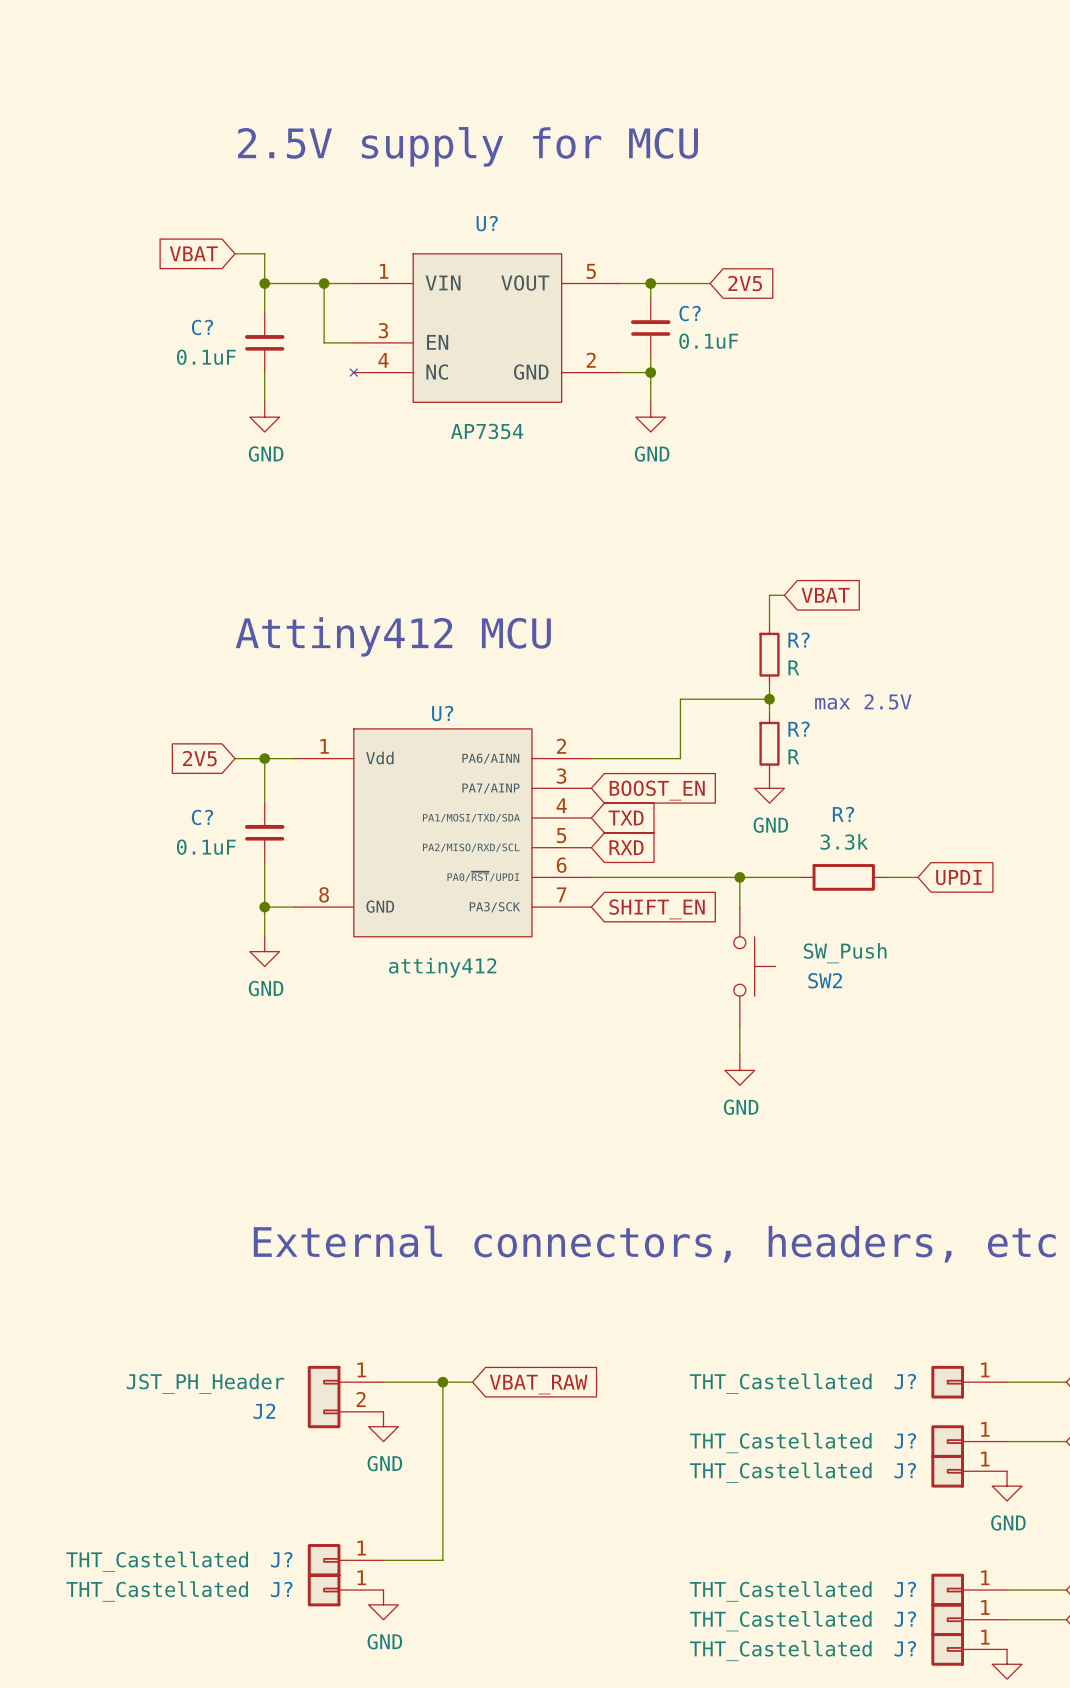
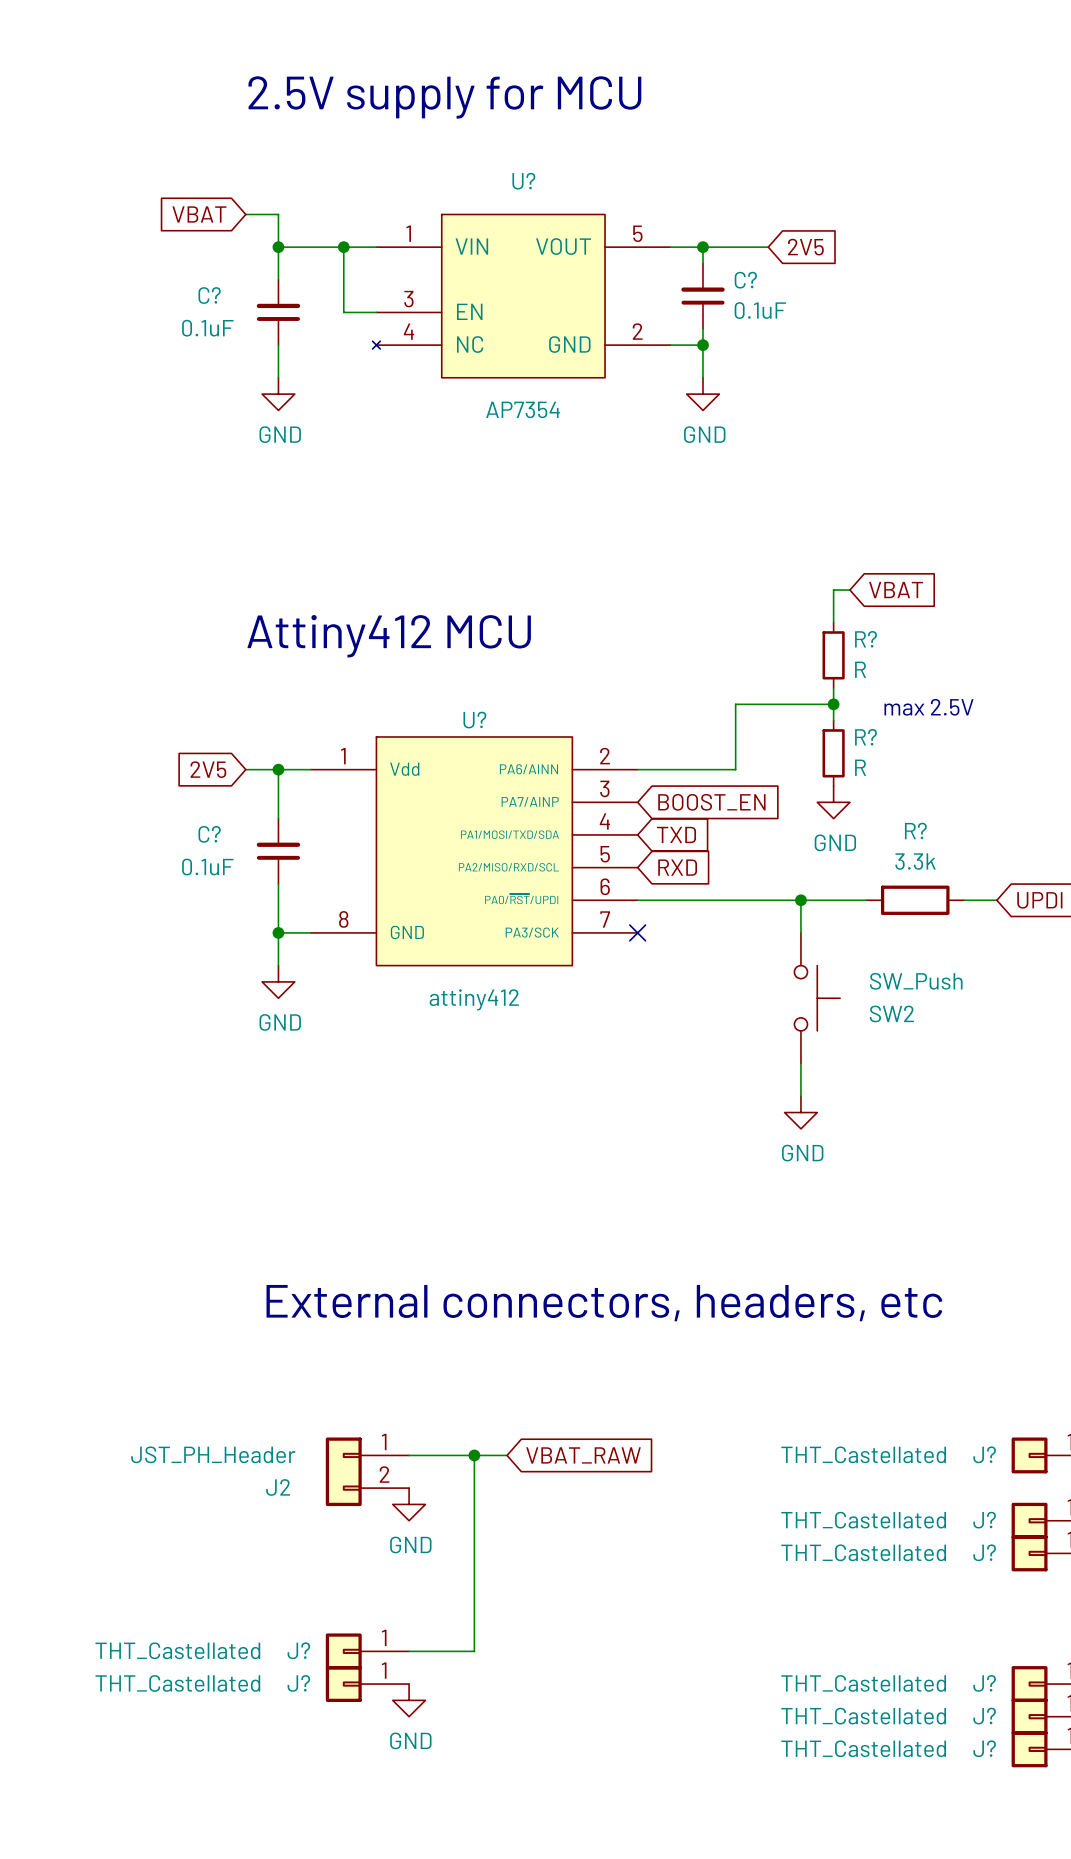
no-connect mark: none -> (637, 932)
global label: SHIFT_EN (657, 909) -> none

